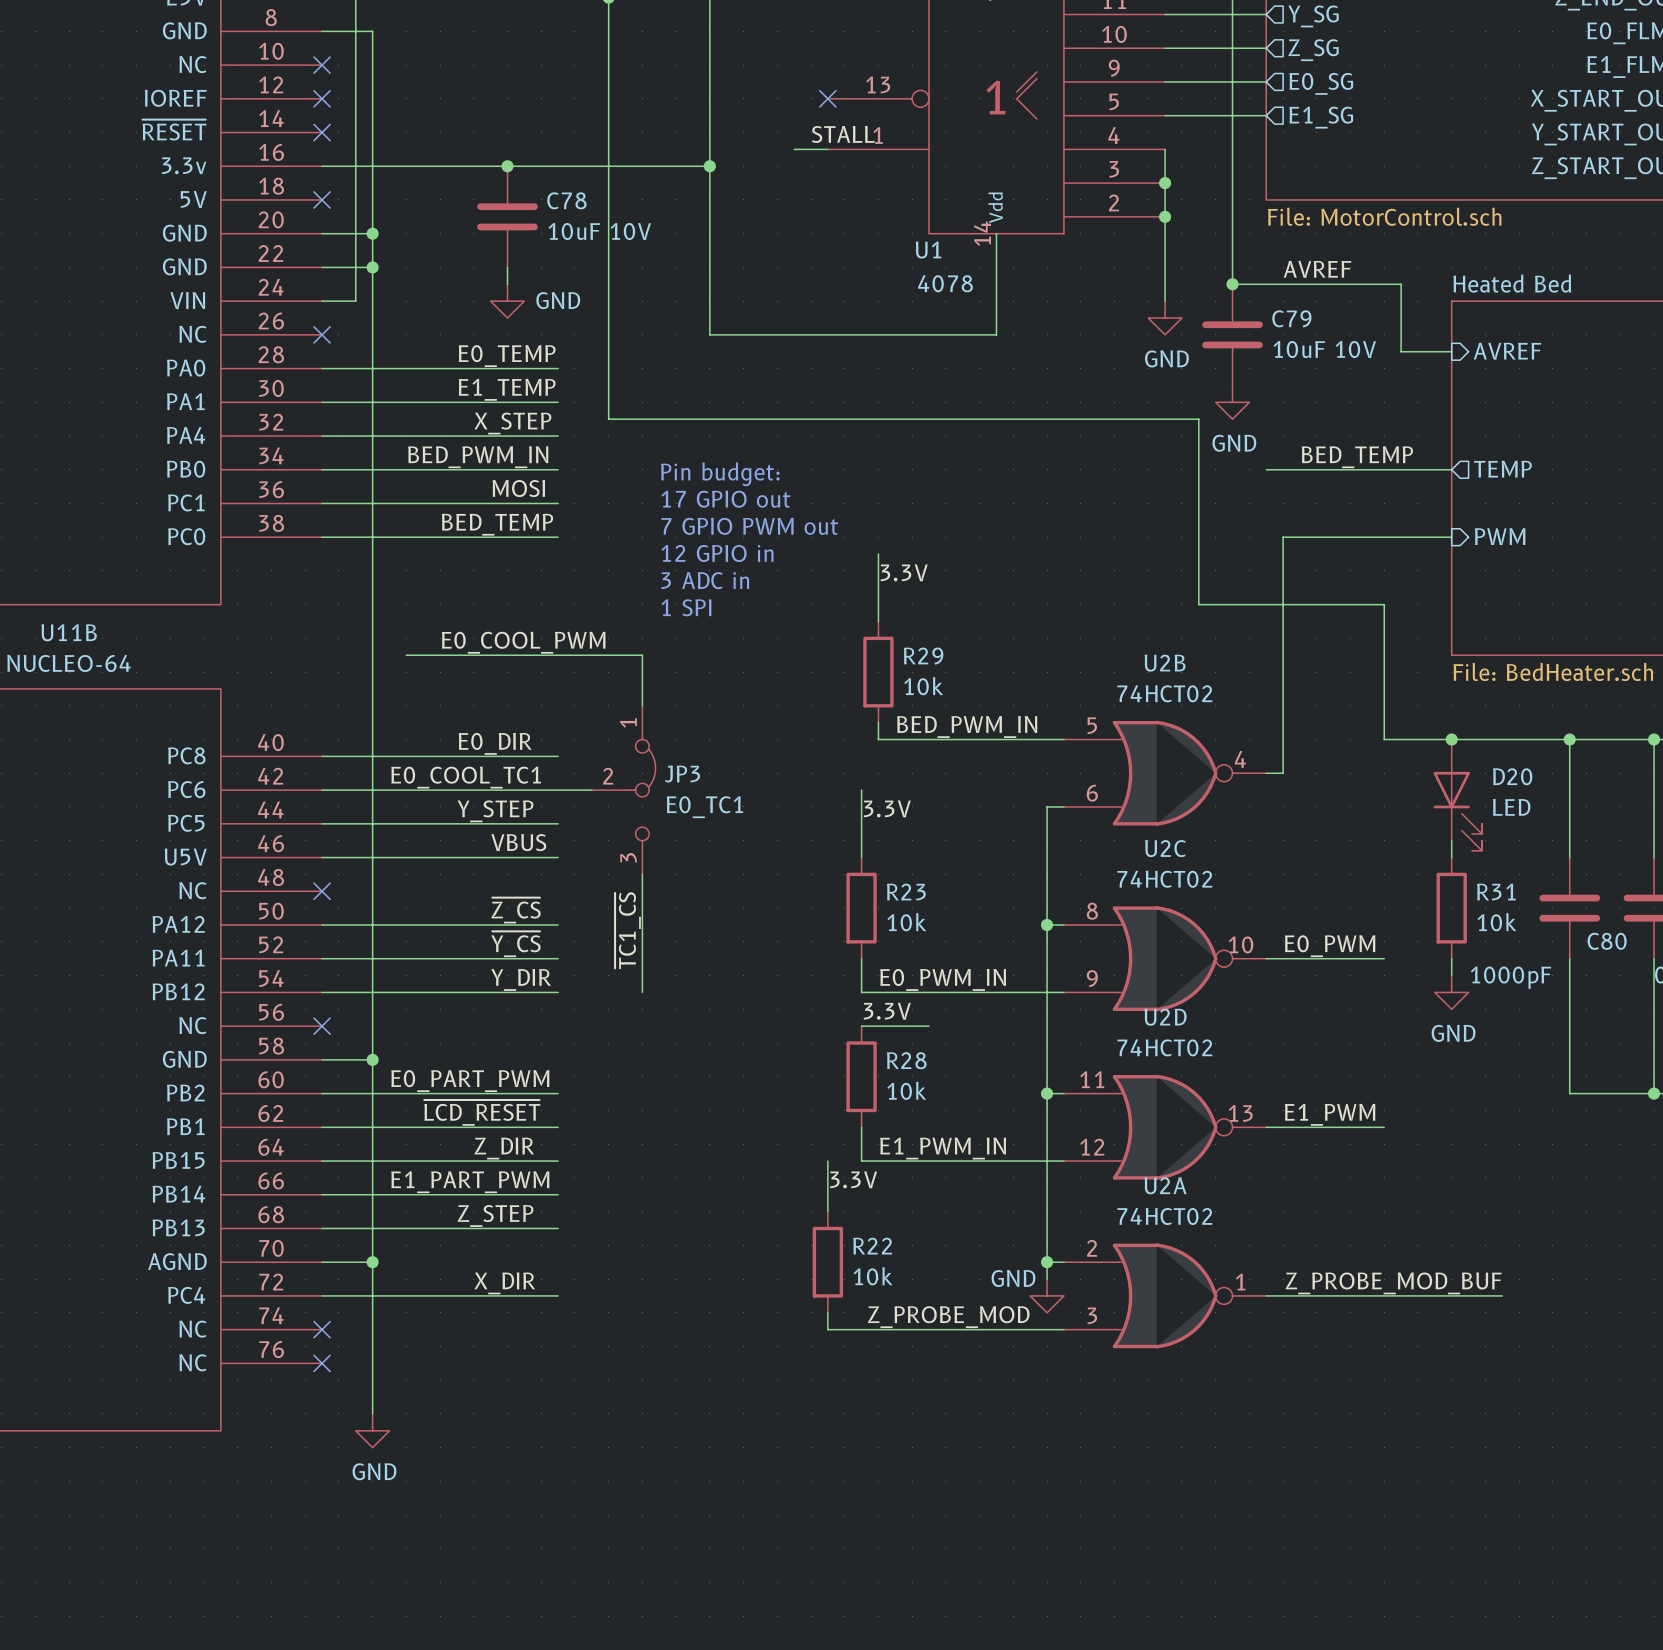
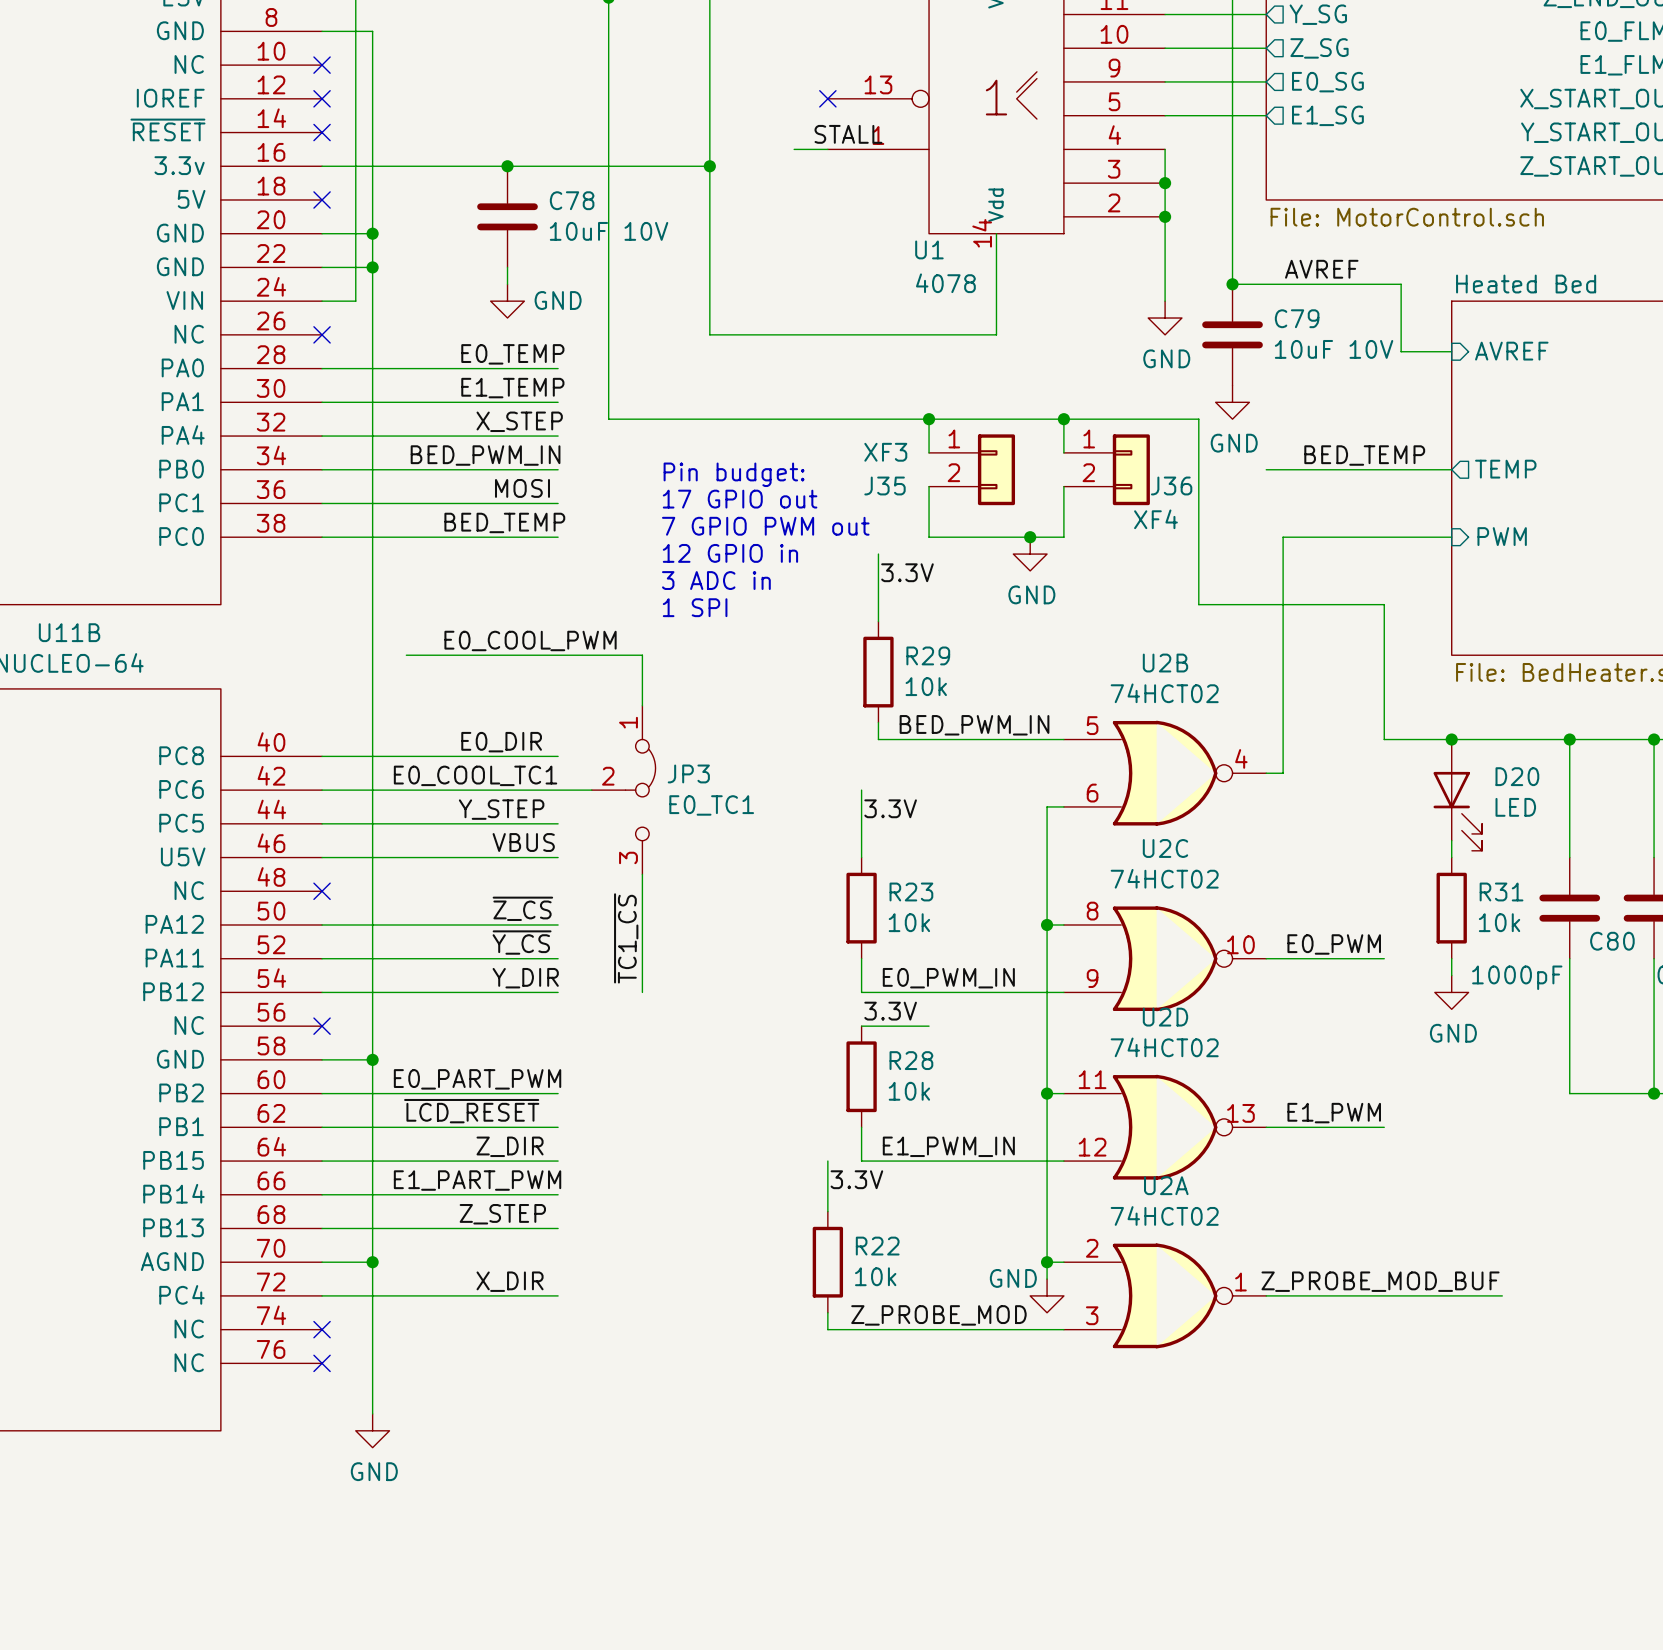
wire: none -> (929, 419) (929, 452)
junction: none -> (929, 419)
wire: none -> (1063, 419) (1063, 452)
junction: none -> (1063, 419)
J35: none -> XF3 (972, 469)
J36: none -> XF4 (1106, 469)
wire: none -> (929, 486) (929, 537) (1063, 537) (1063, 486)
junction: none -> (1030, 537)
power symbol: none -> GND (1030, 554)

